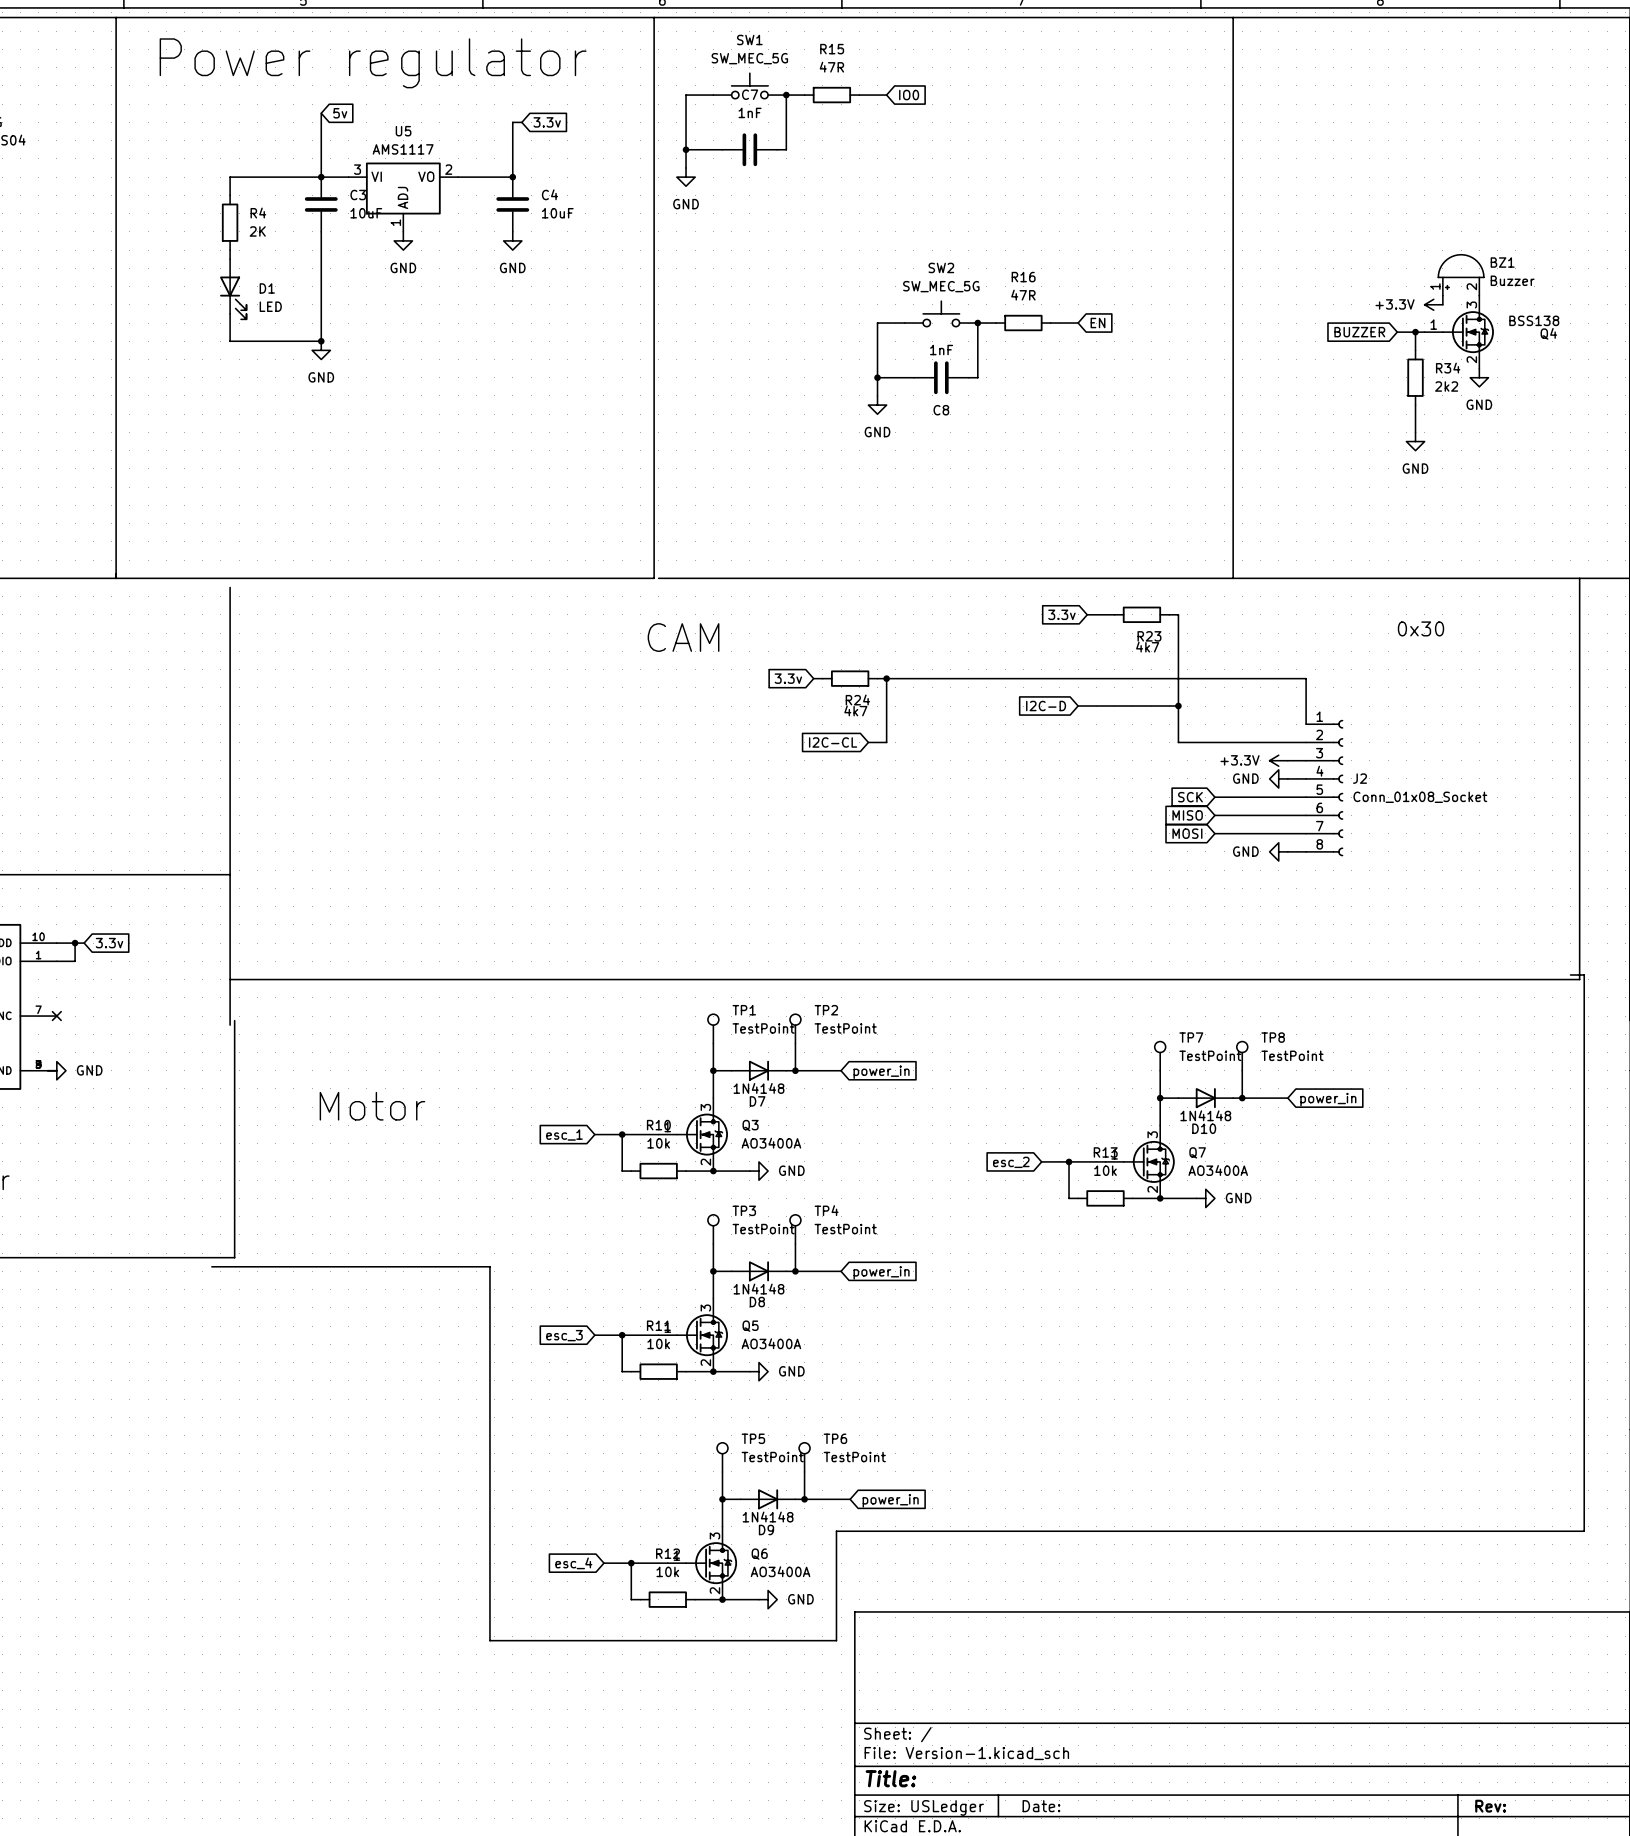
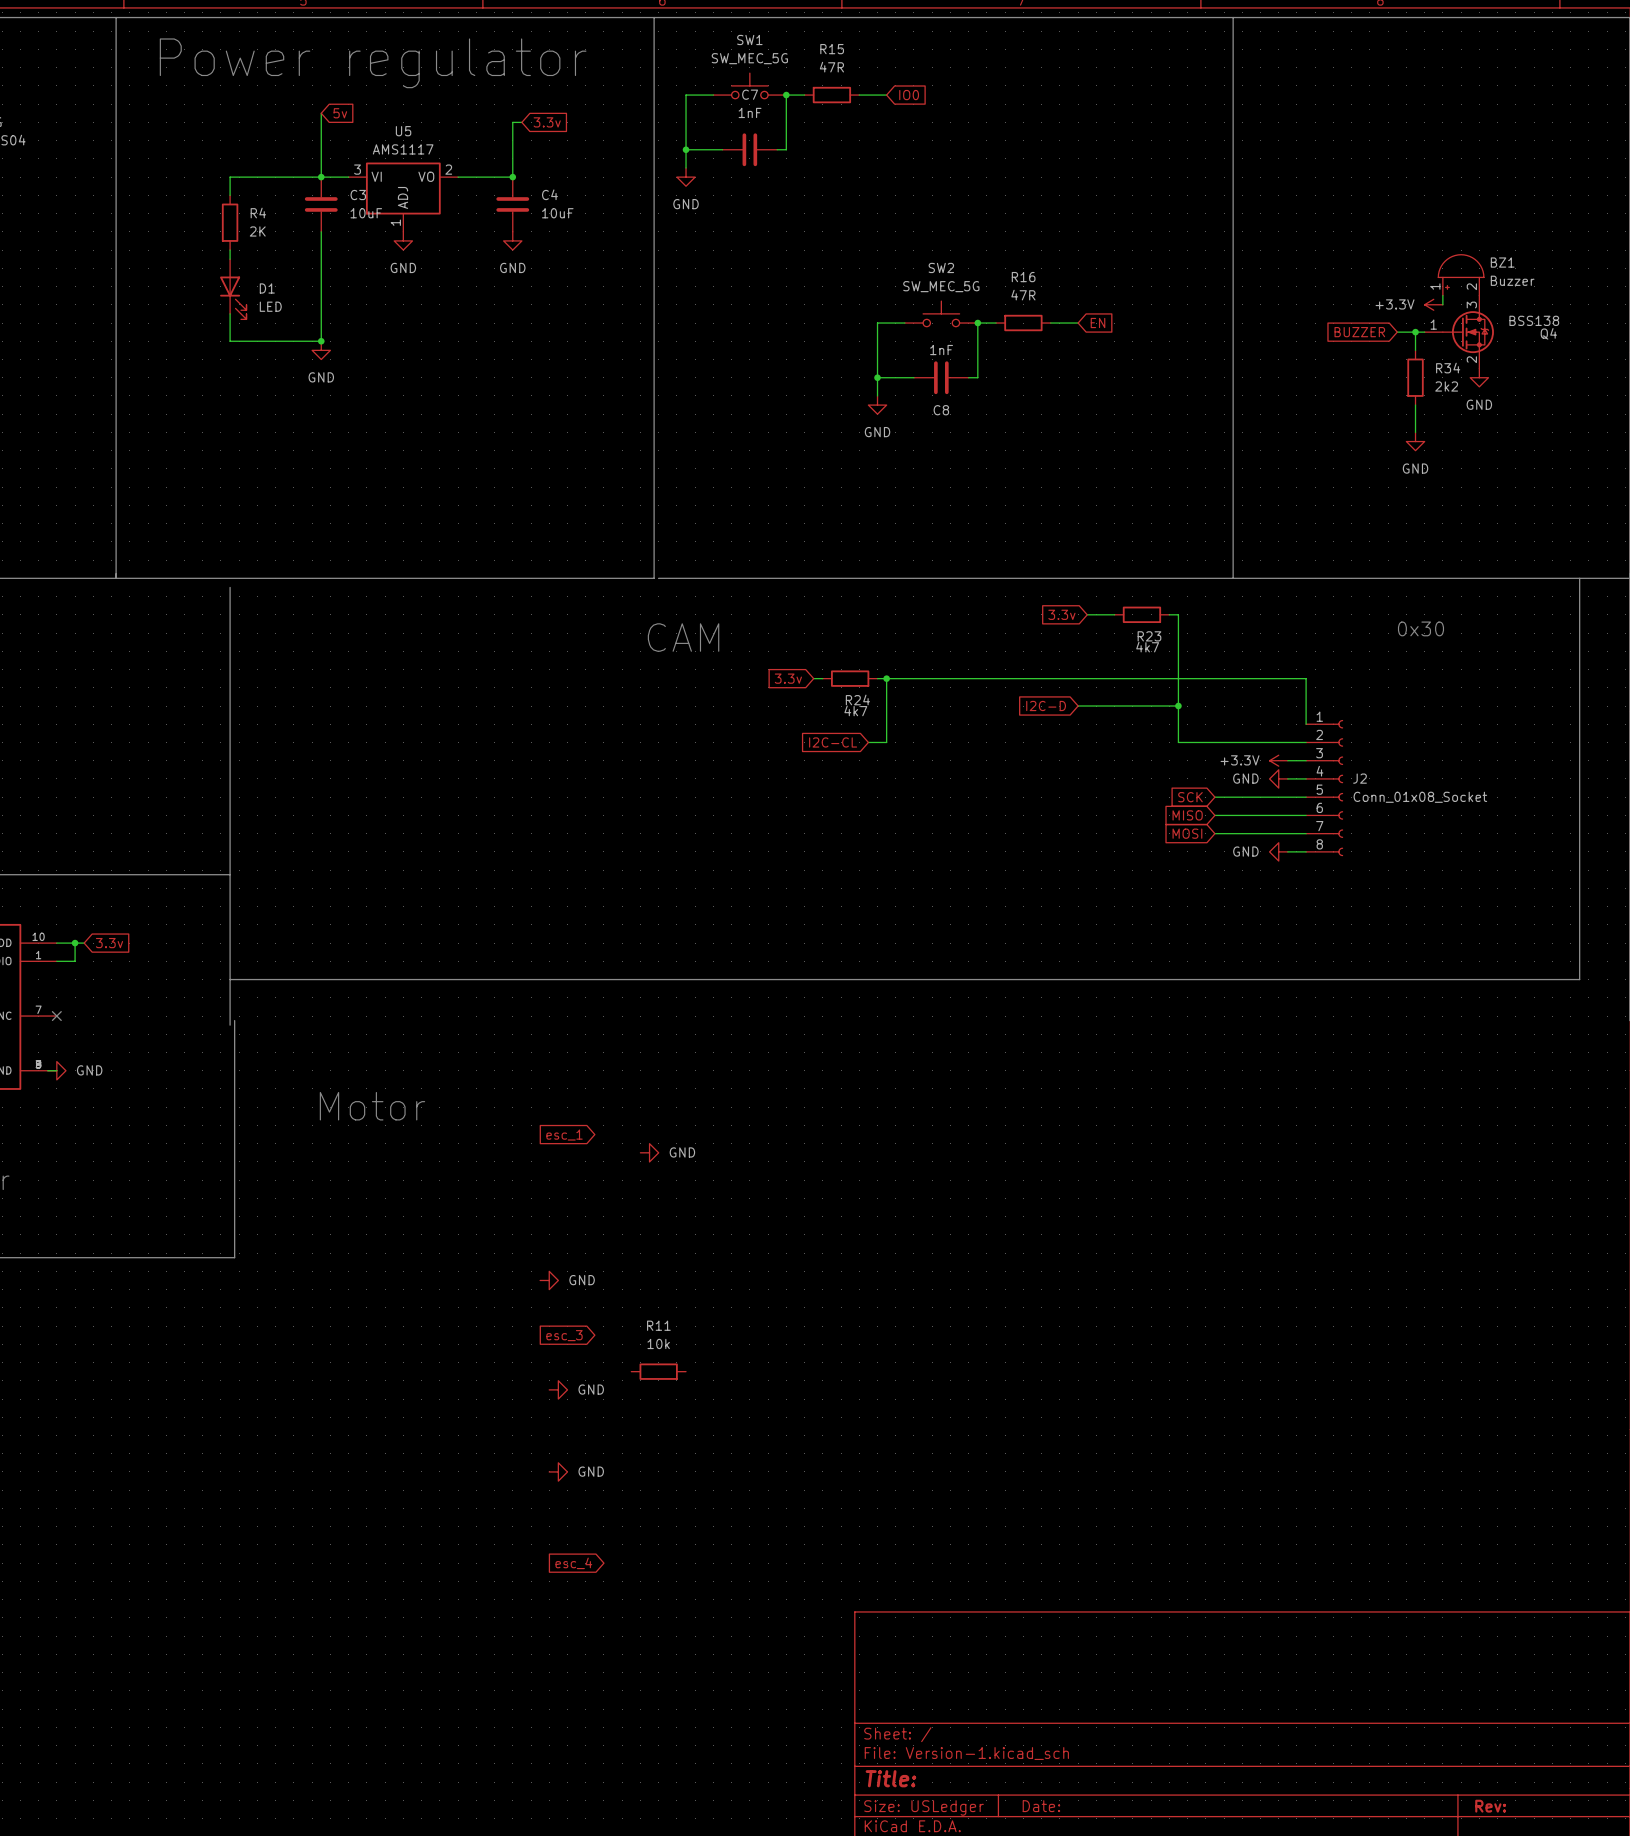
line: (1570, 975) (1584, 975) (1584, 1531) (836, 1531) (836, 1640) (489, 1640) (489, 1266) (211, 1266) -> none
TP1: TestPoint (713, 1028) -> none
TP2: TestPoint (795, 1028) -> none
wire: (713, 1043) (713, 1098) -> none
wire: (795, 1043) (795, 1070) -> none
TP7: TestPoint (1160, 1056) -> none
TP8: TestPoint (1242, 1056) -> none
wire: (713, 1070) (731, 1070) -> none
junction: (713, 1070) -> none
D7: 1N4148 (758, 1070) -> none
wire: (786, 1070) (841, 1070) -> none
junction: (795, 1070) -> none
wire: (1160, 1070) (1160, 1125) -> none
wire: (1242, 1070) (1242, 1098) -> none
global label: power_in (881, 1072) -> none
wire: (1160, 1098) (1178, 1098) -> none
junction: (1160, 1098) -> none
D10: 1N4148 (1205, 1098) -> none
wire: (1233, 1098) (1287, 1098) -> none
junction: (1242, 1098) -> none
global label: power_in (1328, 1099) -> none
wire: (594, 1134) (658, 1134) -> none
wire: (622, 1134) (622, 1171) (631, 1171) -> none
junction: (622, 1134) -> none
Q3: AO3400A (693, 1134) -> none
wire: (1041, 1161) (1105, 1161) -> none
wire: (1069, 1161) (1069, 1198) (1078, 1198) -> none
junction: (1069, 1161) -> none
Q7: AO3400A (1140, 1161) -> none
global label: esc_2 (1011, 1162) -> none
R10: 10k (658, 1171) -> none
wire: (686, 1171) (749, 1171) -> none
junction: (713, 1171) -> none
power symbol position: GND (758, 1171) -> GND (649, 1152)
R13: 10k (1105, 1198) -> none
wire: (1132, 1198) (1196, 1198) -> none
junction: (1160, 1198) -> none
power symbol: GND (1205, 1198) -> none
TP3: TestPoint (713, 1229) -> none
TP4: TestPoint (795, 1229) -> none
wire: (713, 1244) (713, 1298) -> none
wire: (795, 1244) (795, 1271) -> none
wire: (713, 1271) (731, 1271) -> none
junction: (713, 1271) -> none
D8: 1N4148 (758, 1271) -> none
wire: (786, 1271) (841, 1271) -> none
junction: (795, 1271) -> none
global label: power_in (881, 1272) -> none
power symbol: none -> GND (549, 1280)
wire: (594, 1335) (658, 1335) -> none
wire: (622, 1335) (622, 1371) (631, 1371) -> none
junction: (622, 1335) -> none
Q5: AO3400A (693, 1335) -> none
wire: (686, 1371) (749, 1371) -> none
junction: (713, 1371) -> none
power symbol: GND (758, 1371) -> none
power symbol: none -> GND (558, 1389)
TP5: TestPoint (722, 1457) -> none
TP6: TestPoint (804, 1457) -> none
power symbol: none -> GND (558, 1471)
wire: (722, 1471) (722, 1526) -> none
wire: (804, 1471) (804, 1499) -> none
wire: (722, 1499) (740, 1499) -> none
junction: (722, 1499) -> none
D9: 1N4148 (768, 1499) -> none
wire: (795, 1499) (850, 1499) -> none
junction: (804, 1499) -> none
global label: power_in (890, 1500) -> none
wire: (603, 1563) (667, 1563) -> none
wire: (631, 1563) (631, 1599) (640, 1599) -> none
junction: (631, 1563) -> none
Q6: AO3400A (702, 1563) -> none
R12: 10k (667, 1599) -> none
wire: (695, 1599) (758, 1599) -> none
junction: (722, 1599) -> none
power symbol: GND (768, 1599) -> none

